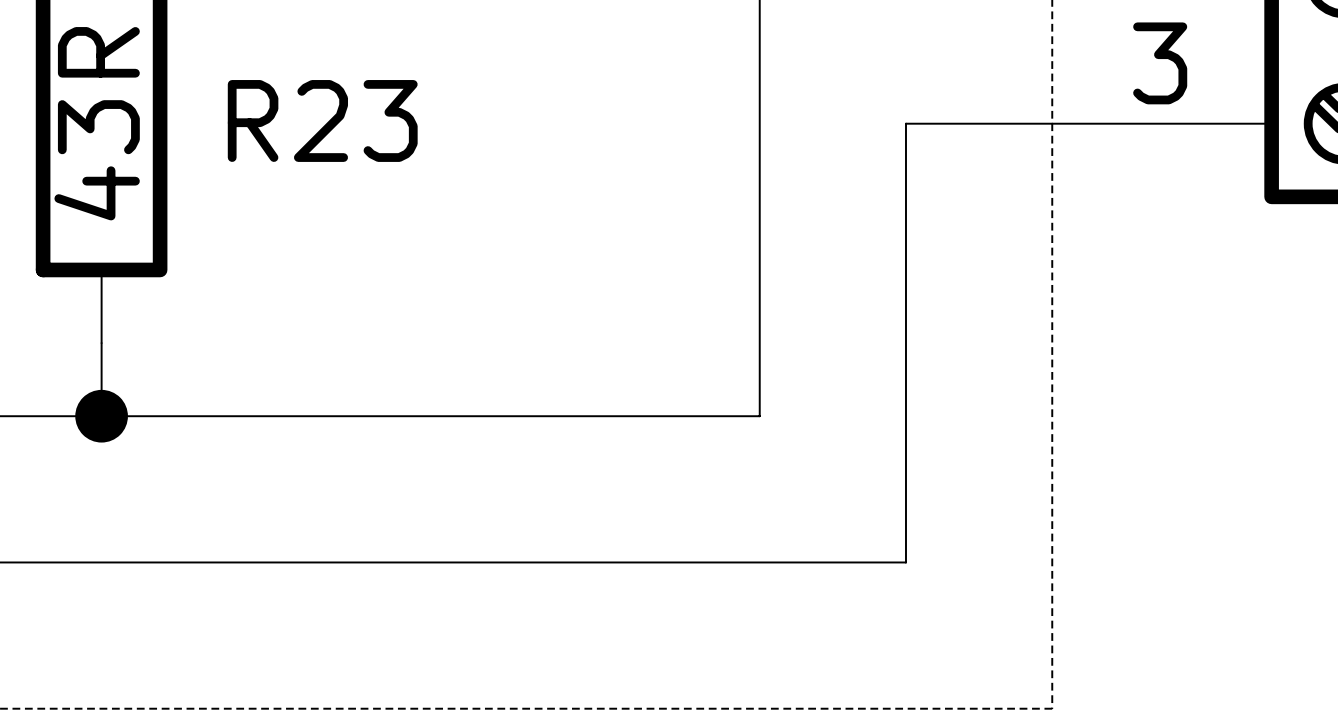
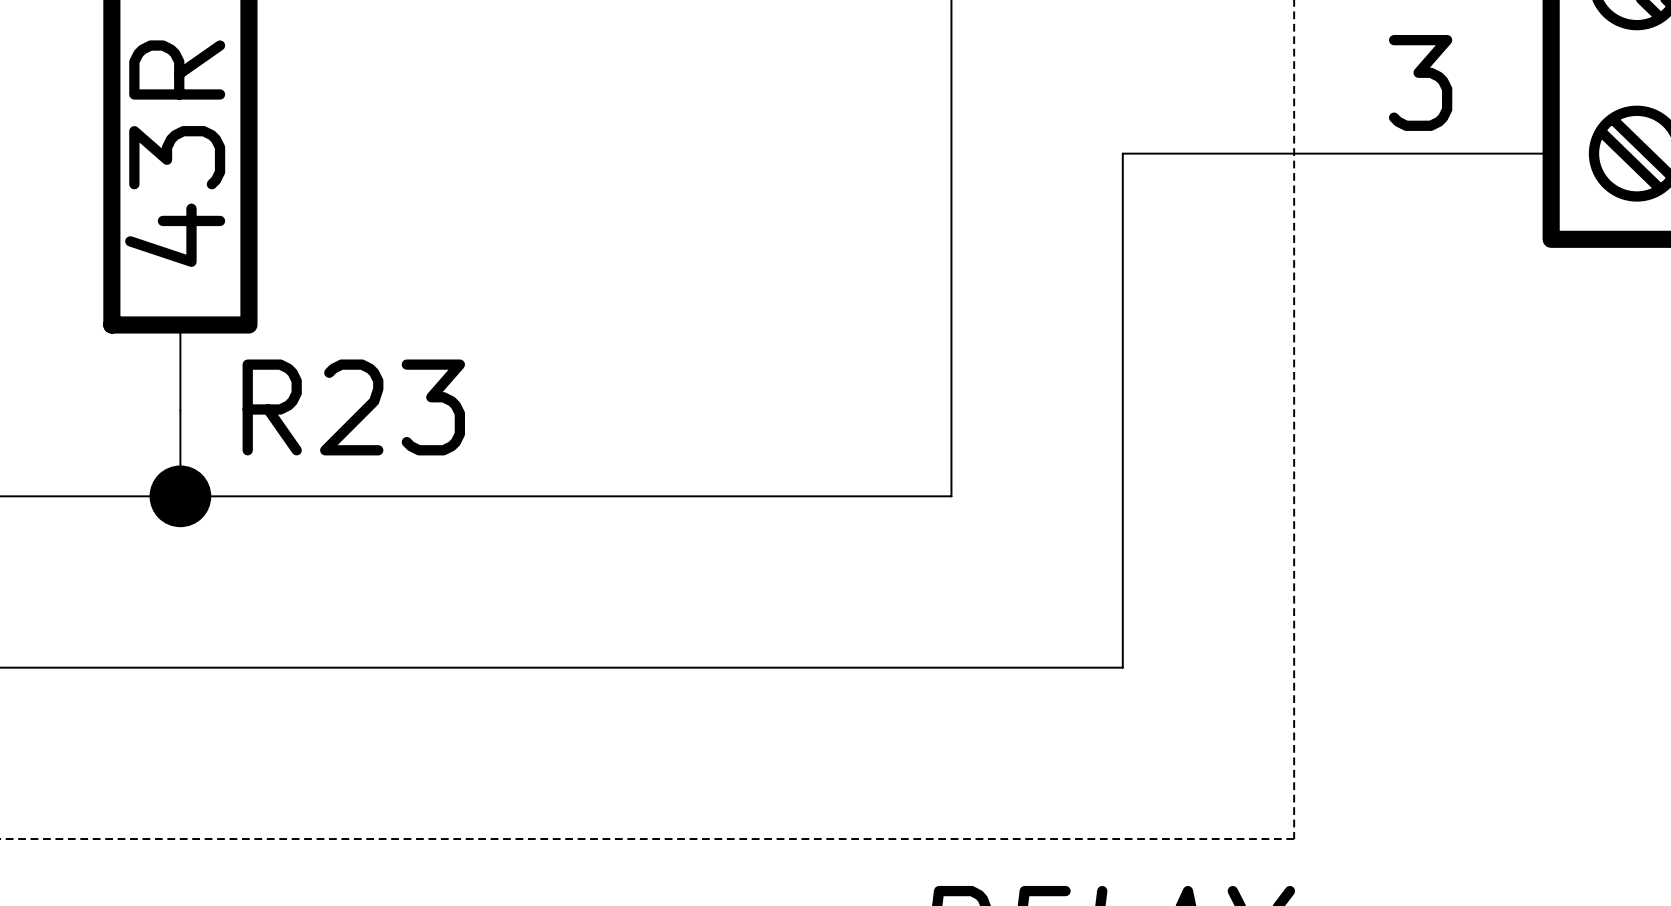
R23 name position: R23 (322, 120) -> R23 (353, 407)

